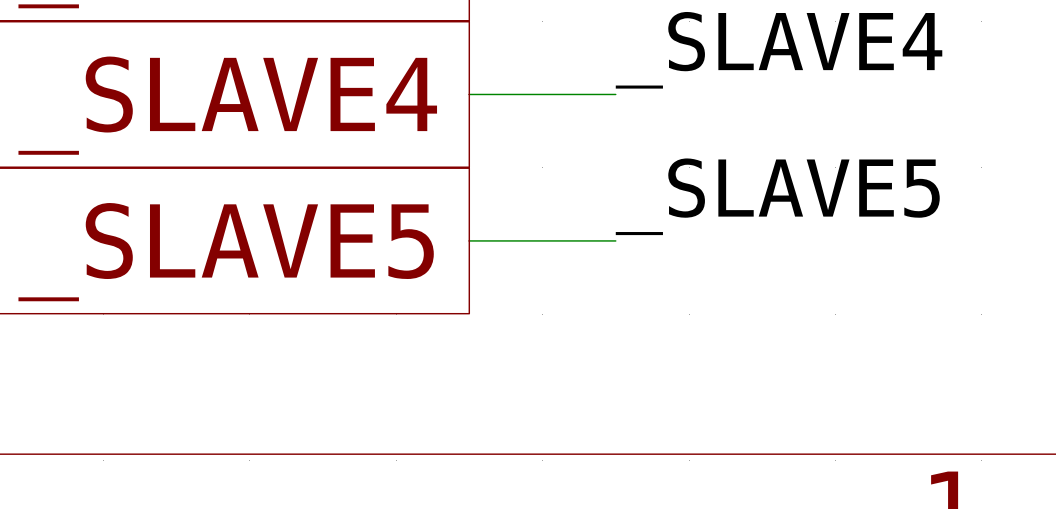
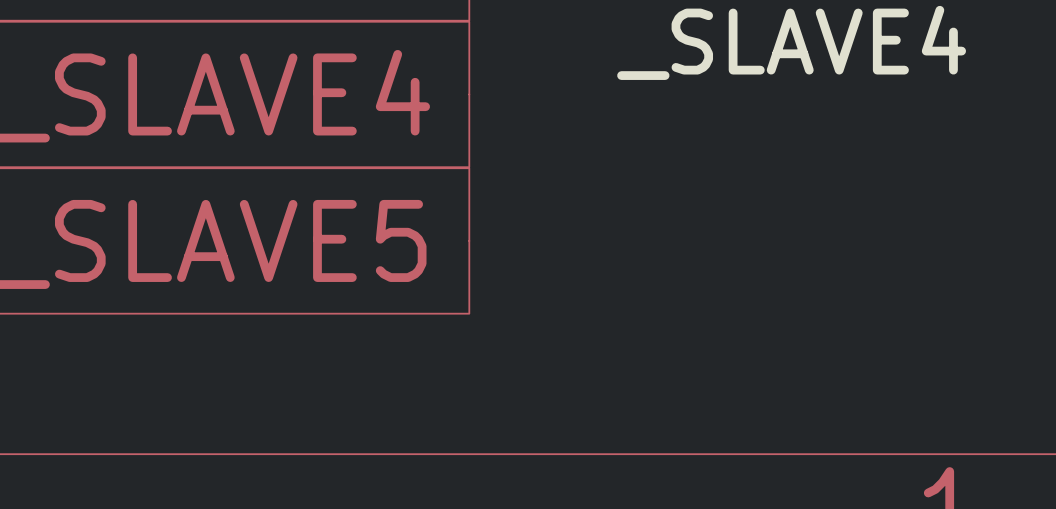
wire: (469, 94) (615, 94) -> none
label: _SLAVE5 (777, 196) -> none
wire: (469, 240) (615, 240) -> none

